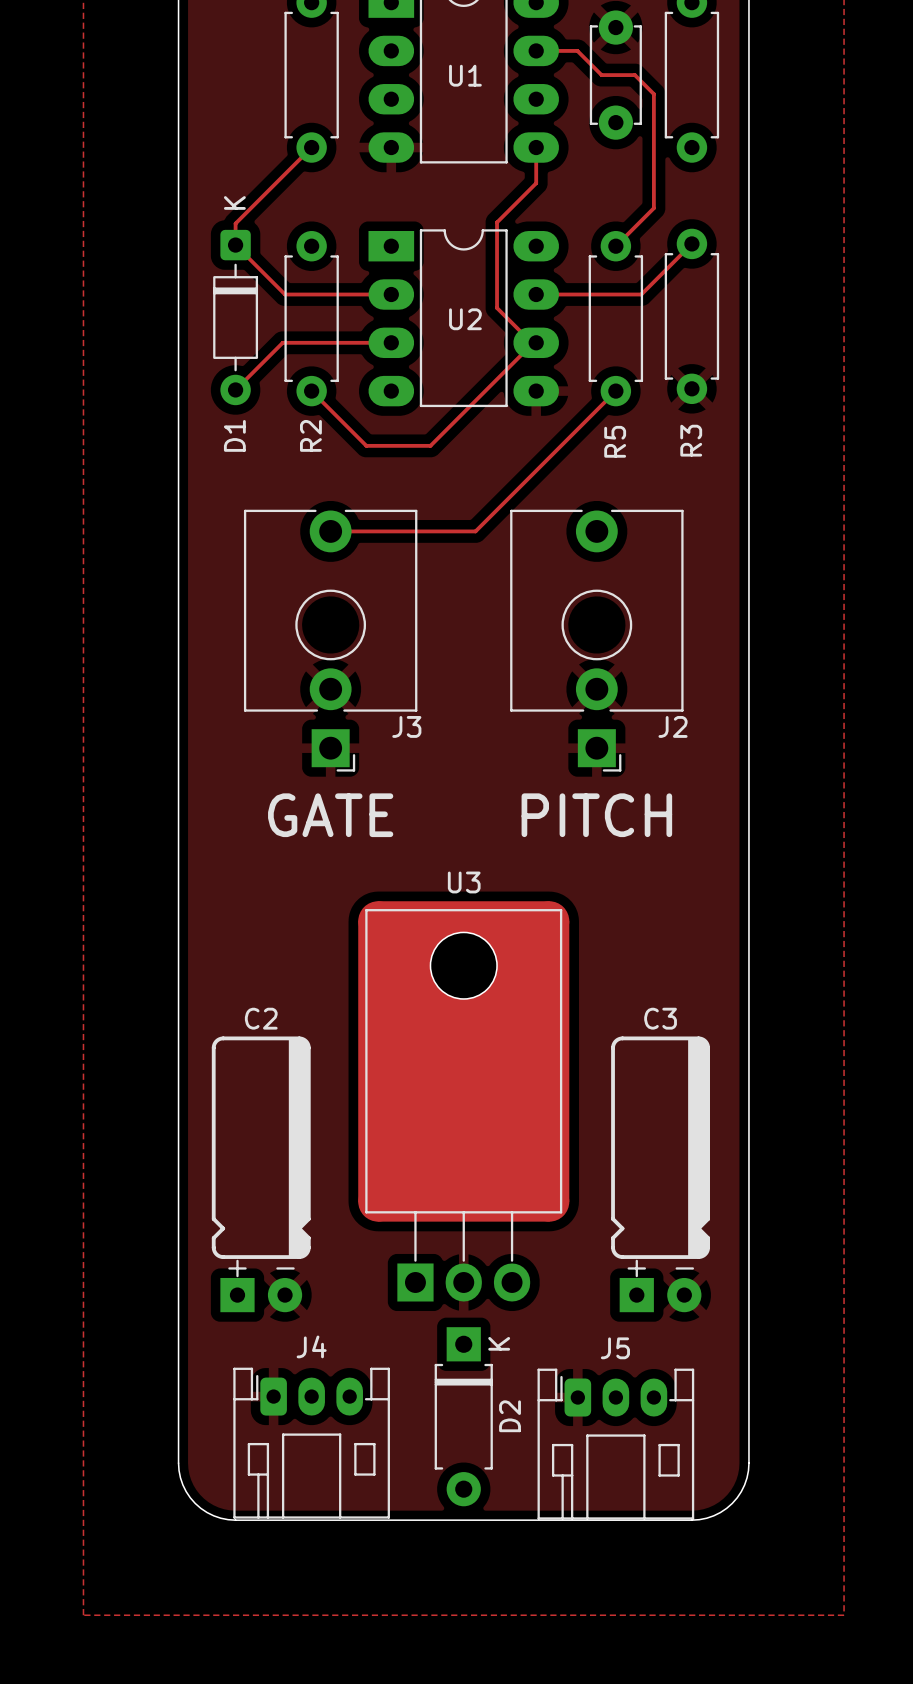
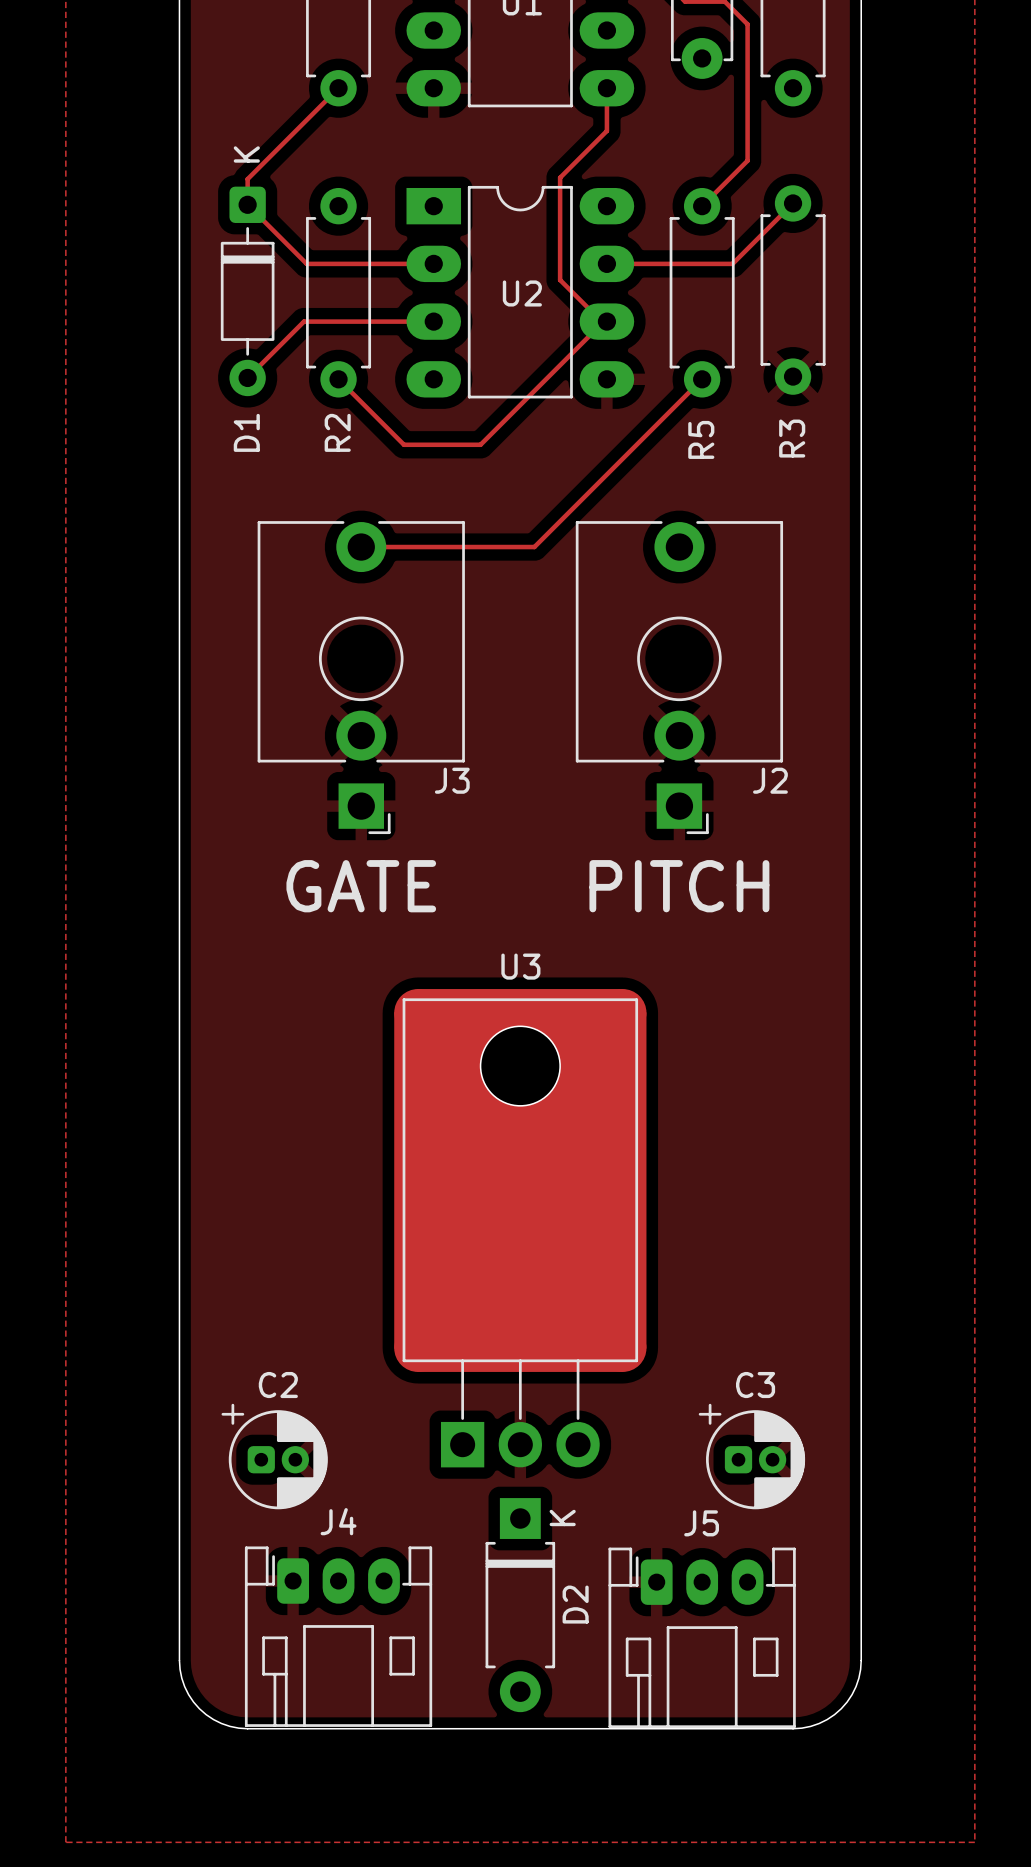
C2 name position: C2 (261, 1018) -> C2 (278, 1385)
C3 name position: C3 (660, 1018) -> C3 (755, 1385)
C2 footprint: [211, 1036, 311, 1313] -> [221, 1403, 328, 1510]
C3 footprint: [611, 1036, 710, 1313] -> [698, 1403, 806, 1510]

